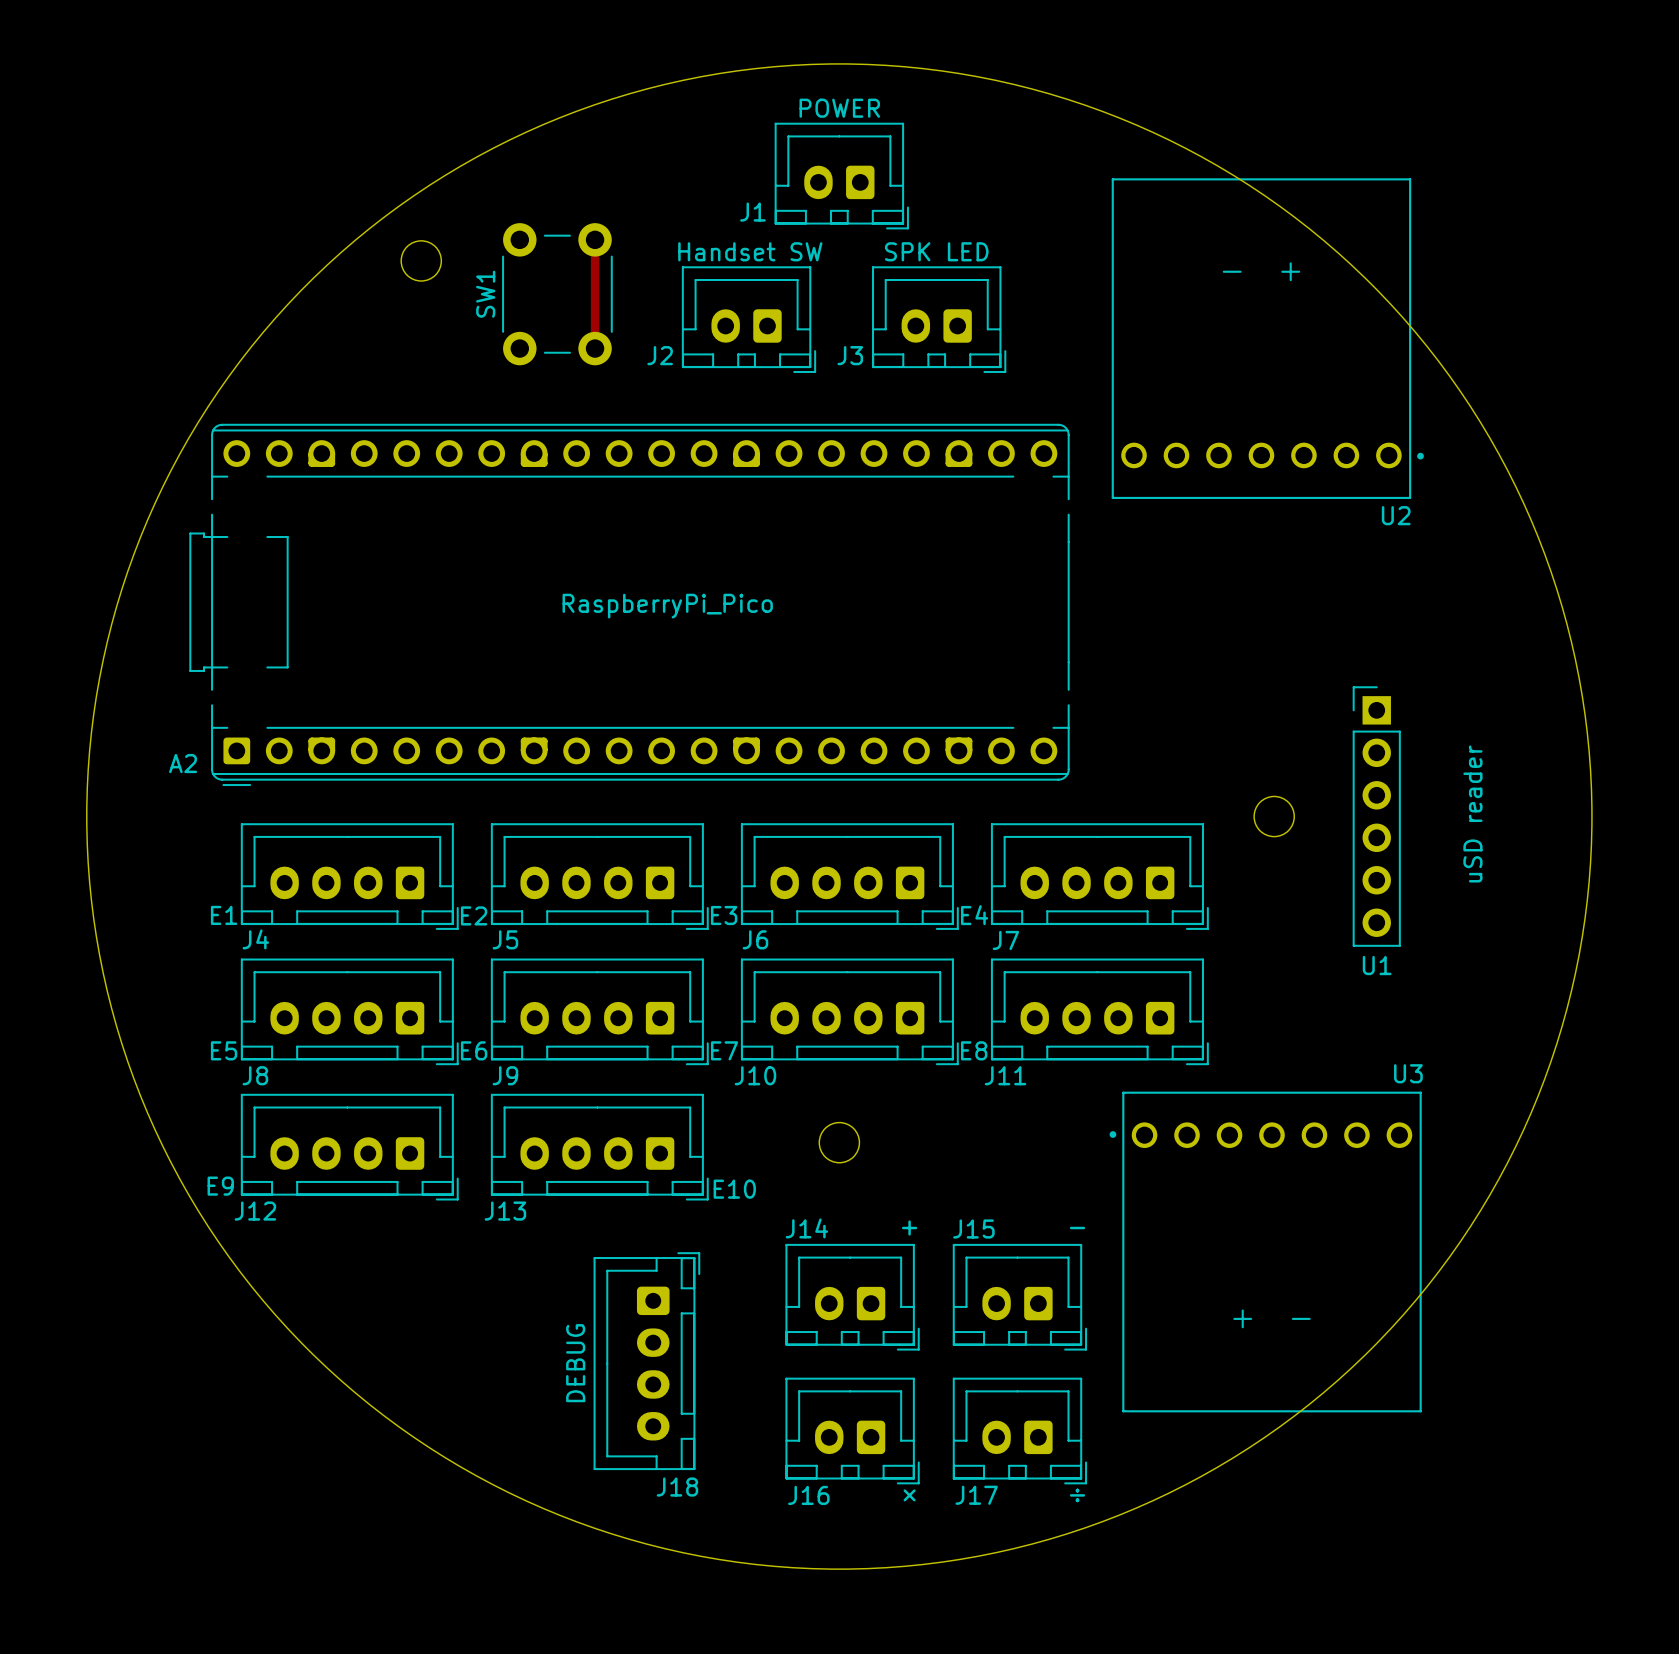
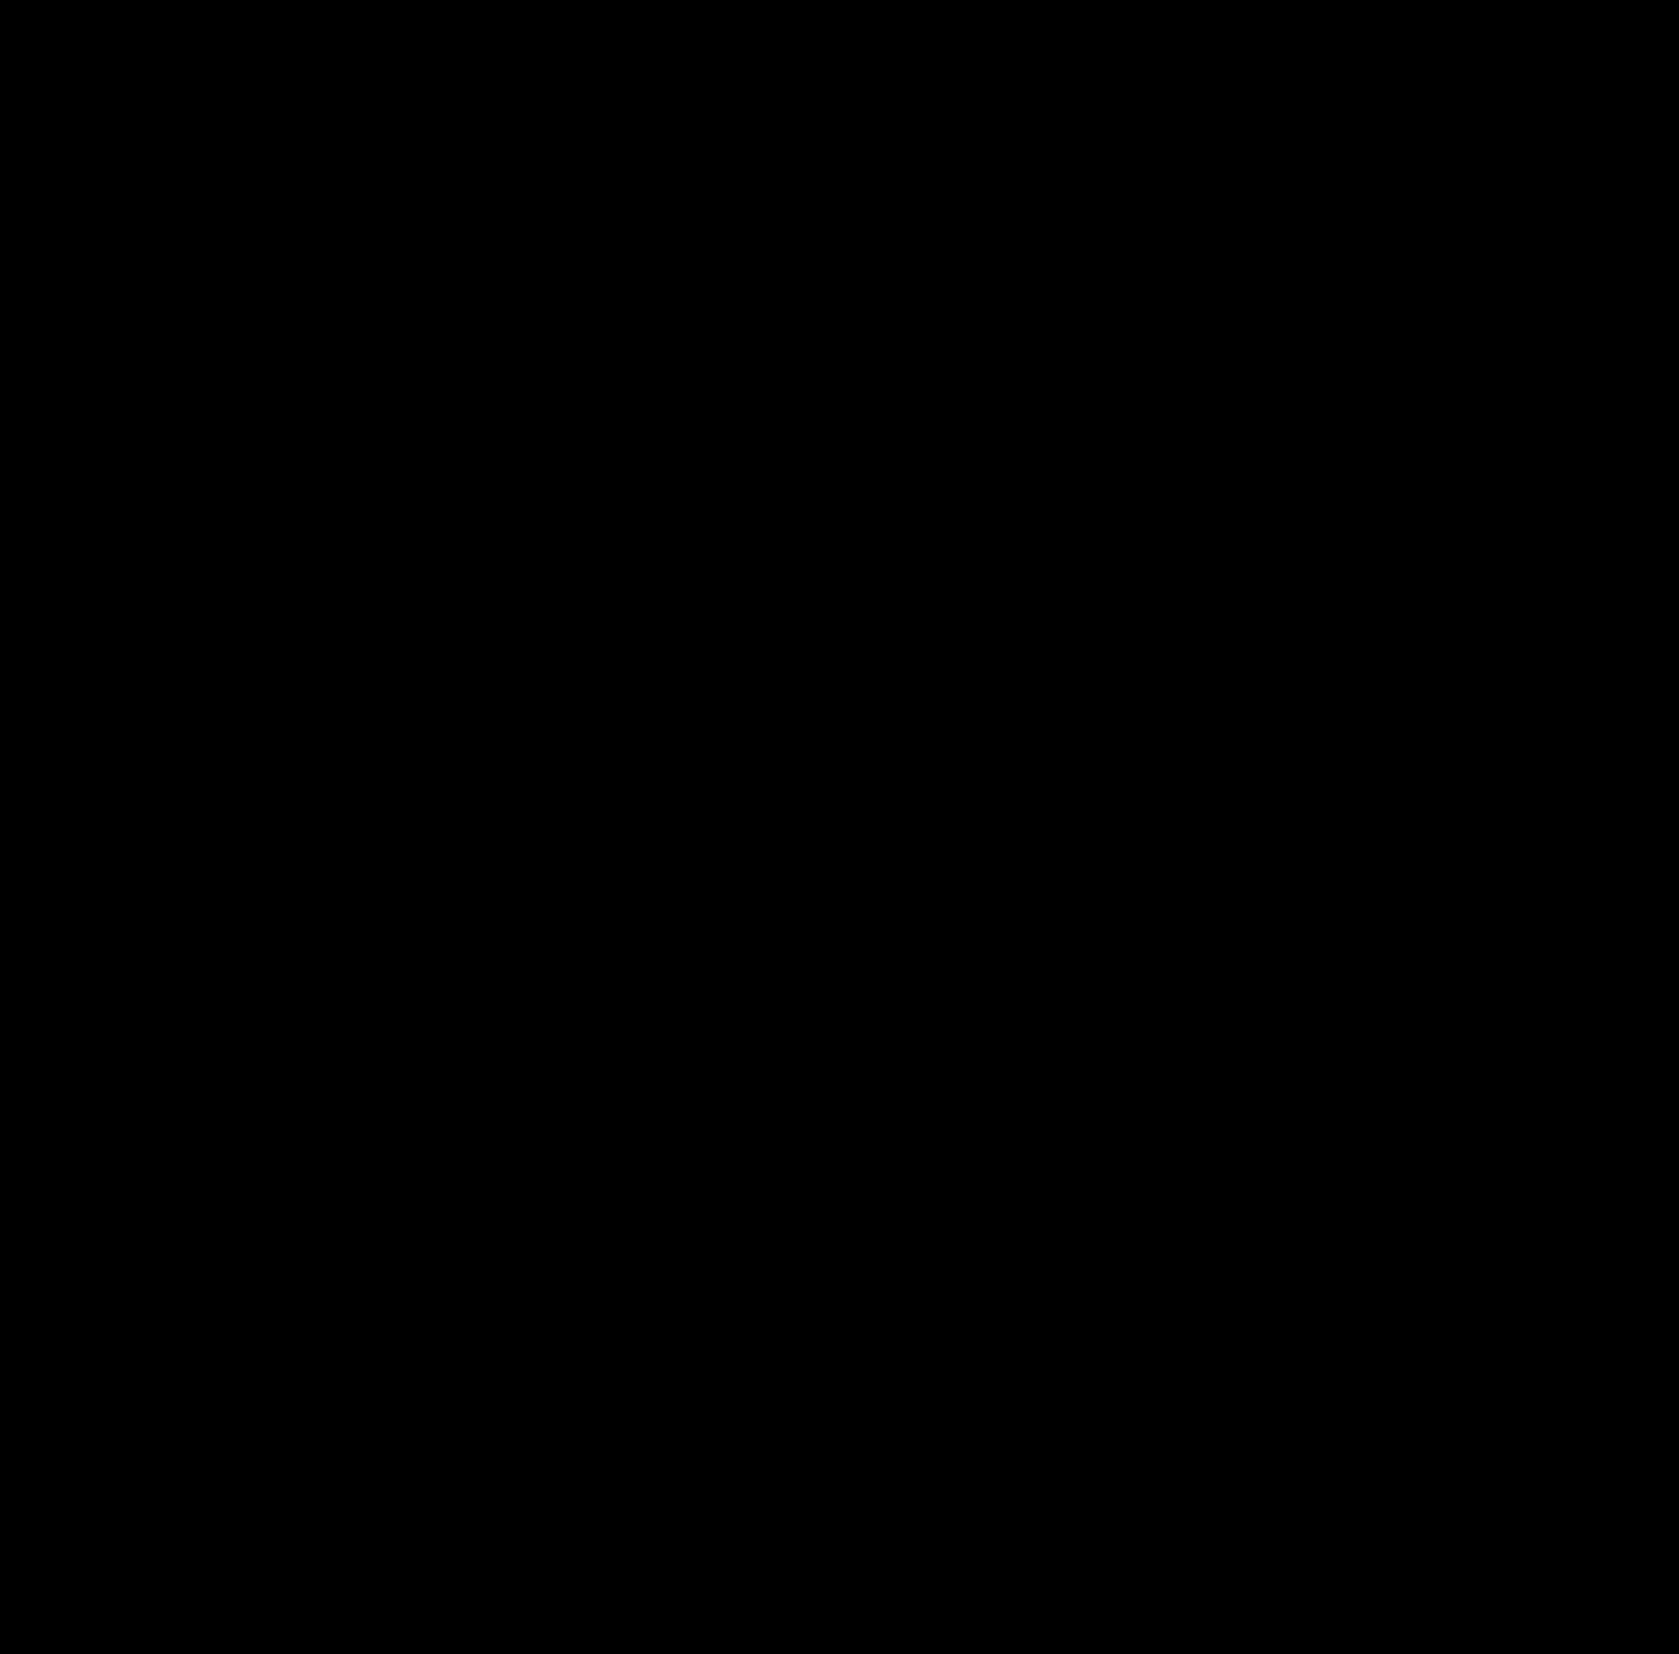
round board edge: [86, 63, 1593, 1570] -> none
J1: POWER (841, 176) -> none
track: (595, 239) (595, 348) -> none
round board edge: [401, 240, 442, 282] -> none
SW1: (557, 294) -> none
J2: Handset SW (749, 319) -> none
J3: SPK LED (939, 319) -> none
U2: (1267, 338) -> none
A2: RaspberryPi_Pico (629, 604) -> none
round board edge: [1254, 796, 1295, 837] -> none
U1: uSD reader (1376, 816) -> none
J4: E1 (349, 876) -> none
J5: E2 (599, 876) -> none
J6: E3 (849, 876) -> none
J7: E4 (1099, 876) -> none
J8: E5 (349, 1011) -> none
J9: E6 (599, 1011) -> none
J10: E7 (849, 1011) -> none
J11: E8 (1099, 1011) -> none
round board edge: [819, 1122, 860, 1163] -> none
J12: E9 (349, 1147) -> none
J13: E10 (599, 1147) -> none
U3: (1265, 1252) -> none
J14: + (852, 1297) -> none
J15: - (1019, 1297) -> none
J18: DEBUG (646, 1361) -> none
J16: × (852, 1431) -> none
J17: ÷ (1019, 1431) -> none

